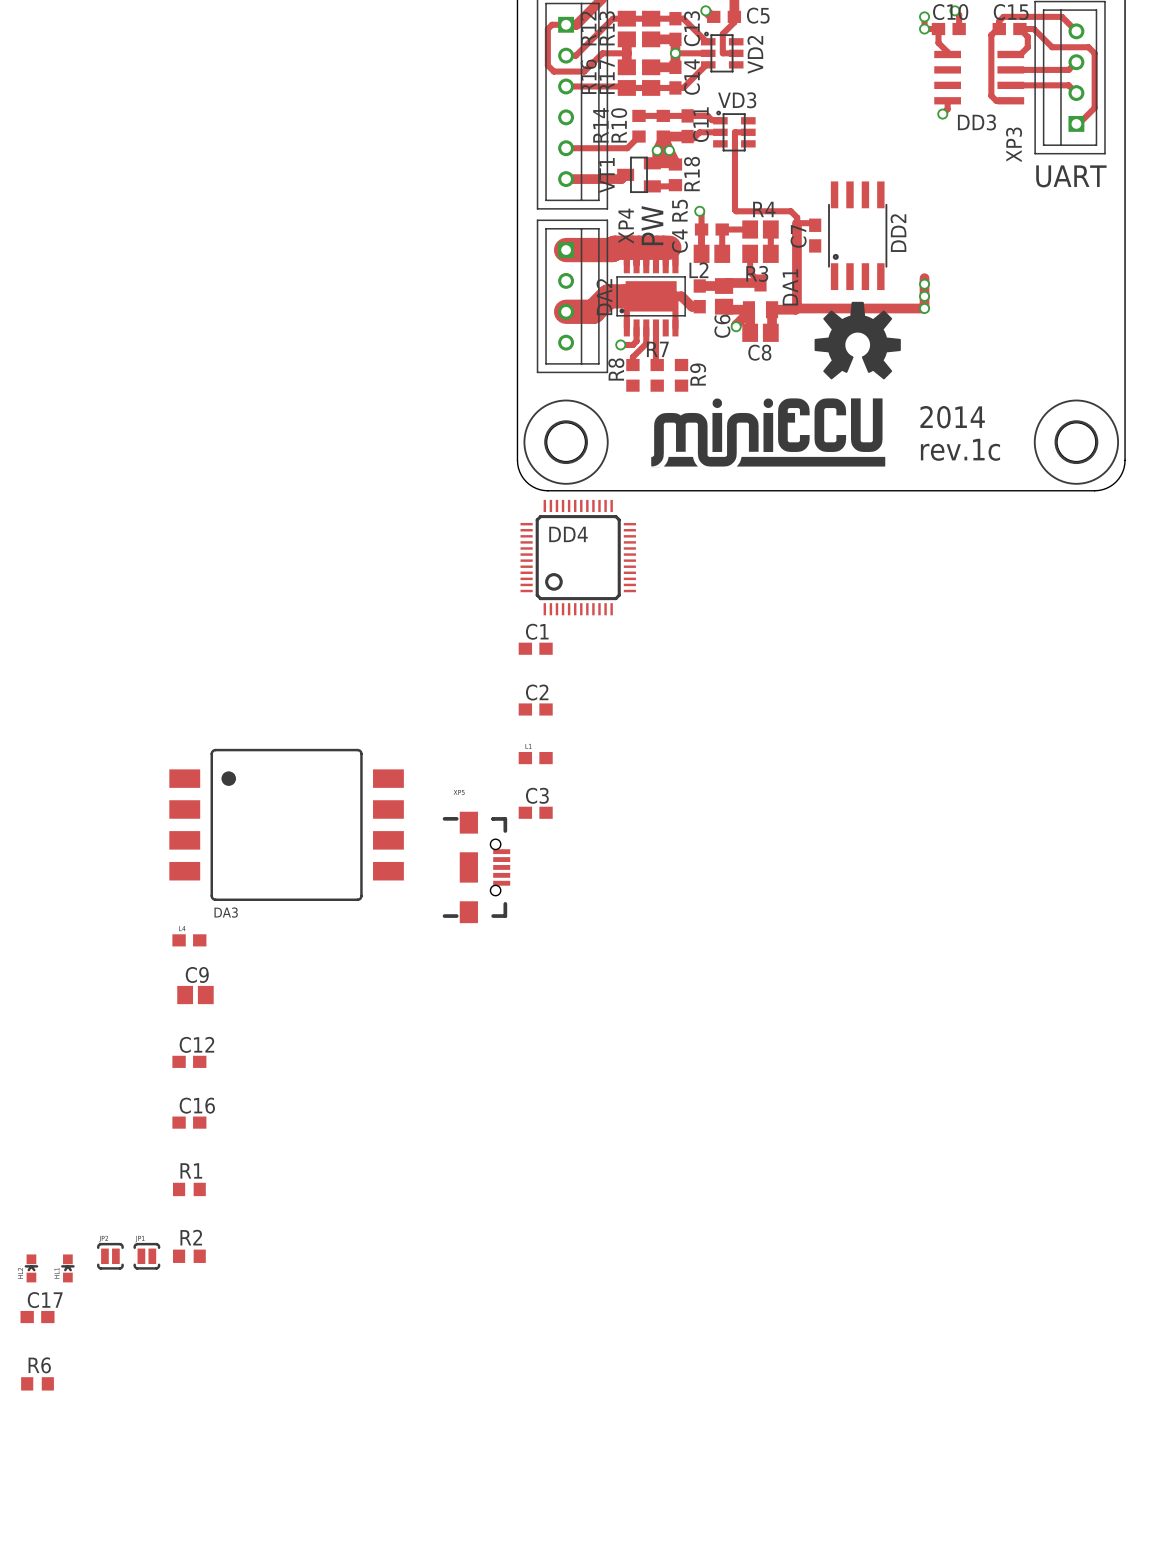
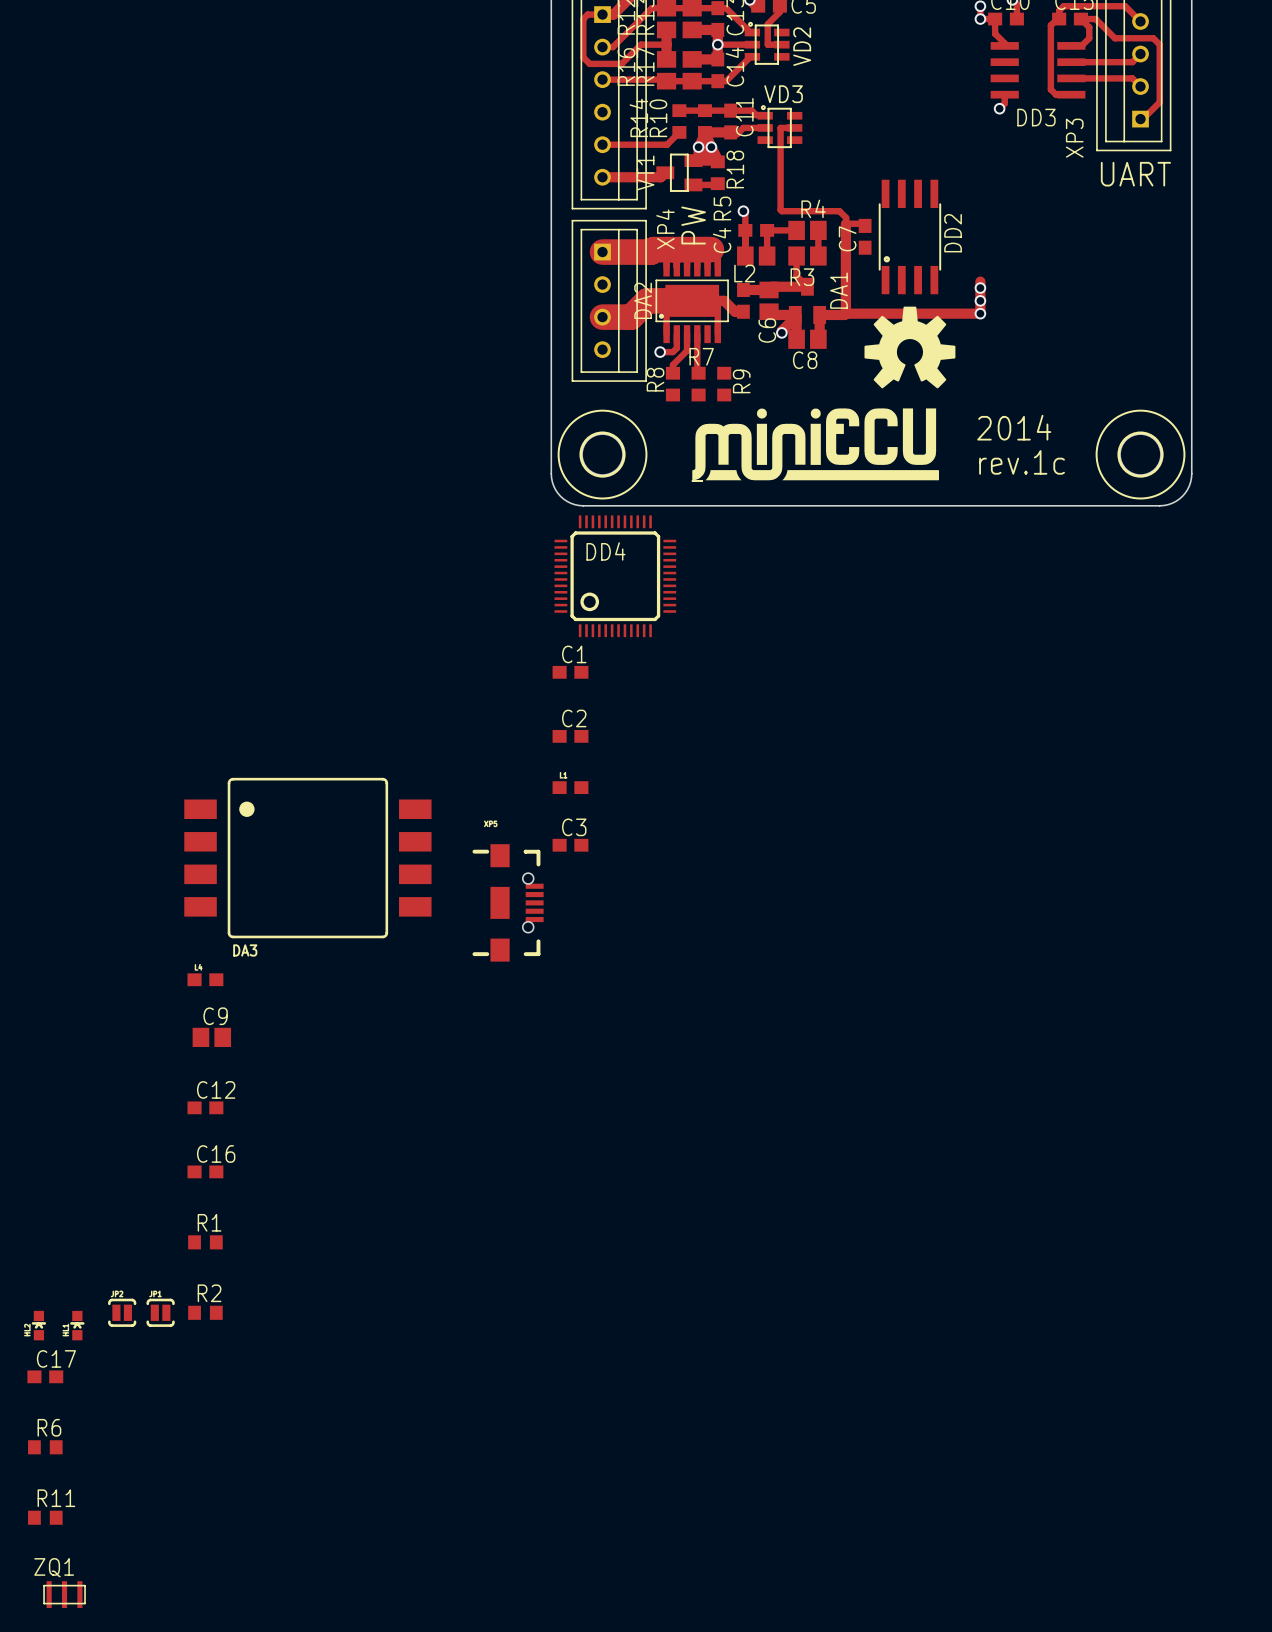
R11: none -> (45, 1517)
ZQ1: none -> (64, 1594)

